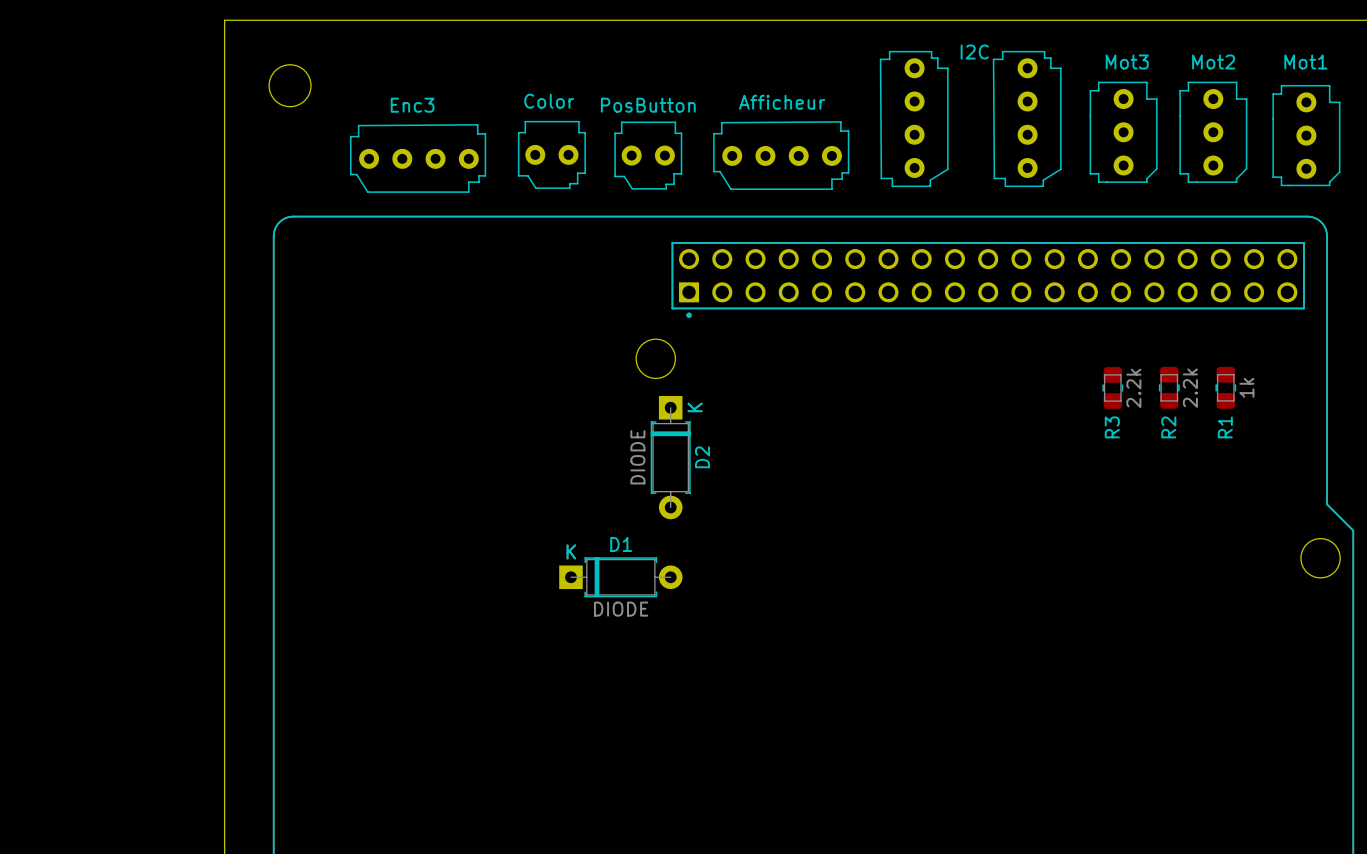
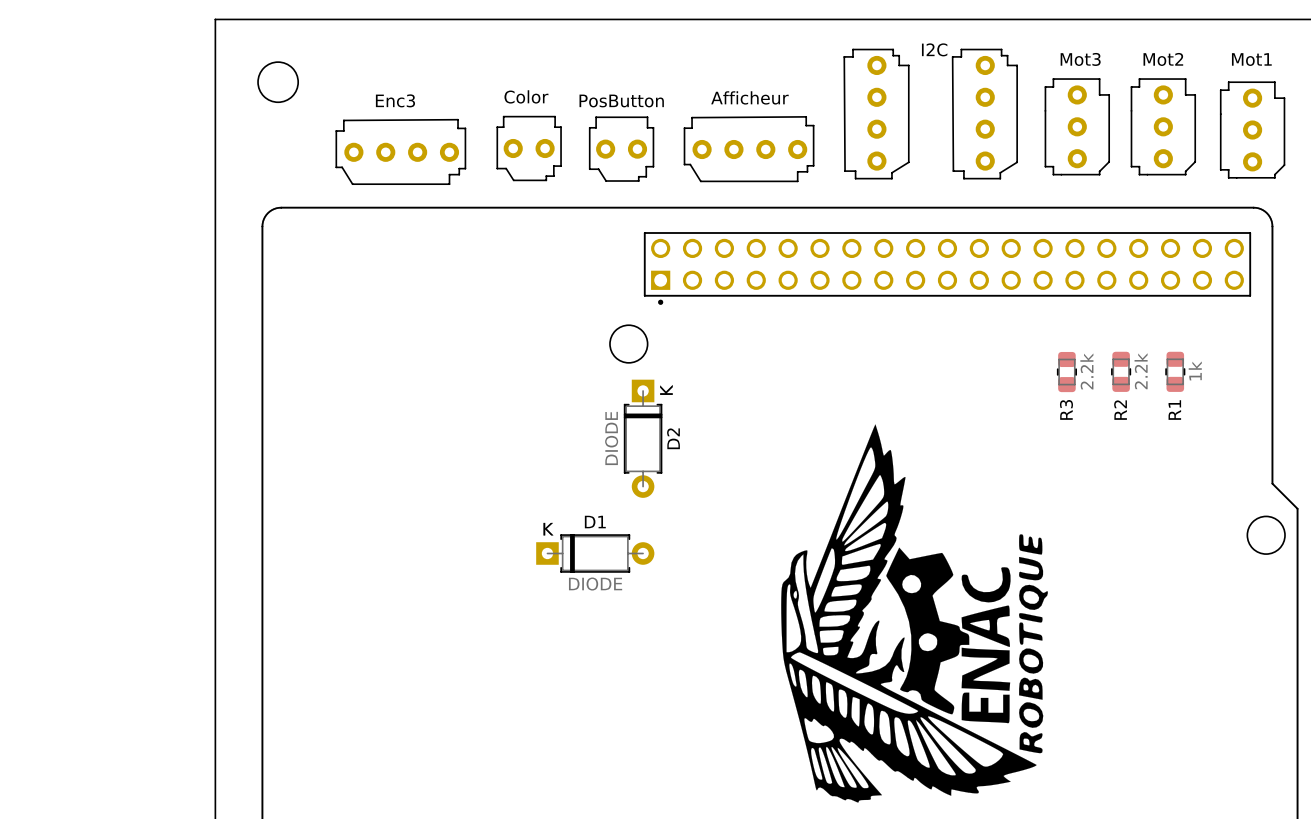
drawing: none -> [781, 424, 1048, 803]

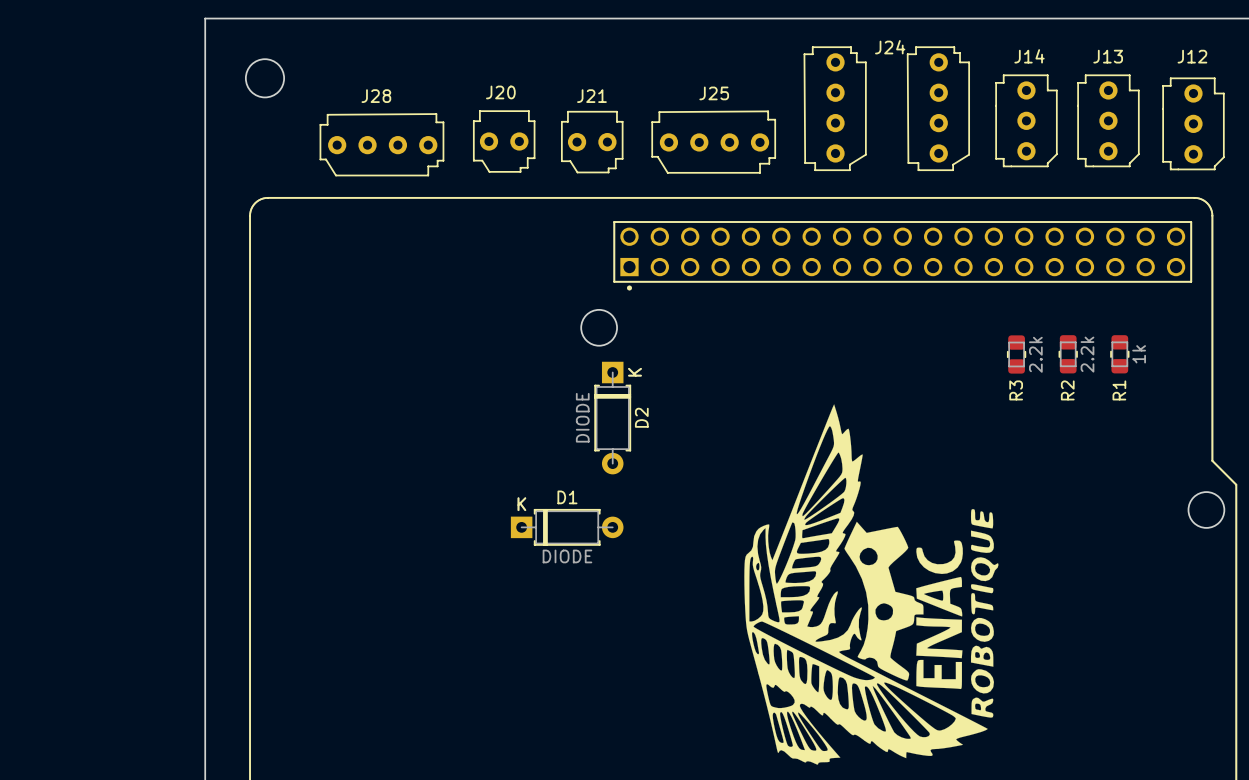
I2C name: I2C (934, 49) -> J24 (890, 47)
Mot3 name: Mot3 (1080, 59) -> J14 (1029, 56)
Mot2 name: Mot2 (1163, 59) -> J13 (1108, 56)
Mot1 name: Mot1 (1251, 59) -> J12 (1192, 56)
Color name: Color (526, 96) -> J20 (500, 92)
Afficheur name: Afficheur (749, 97) -> J25 (714, 93)
Enc3 name: Enc3 (395, 100) -> J28 (376, 96)
PosButton name: PosButton (621, 100) -> J21 (591, 96)

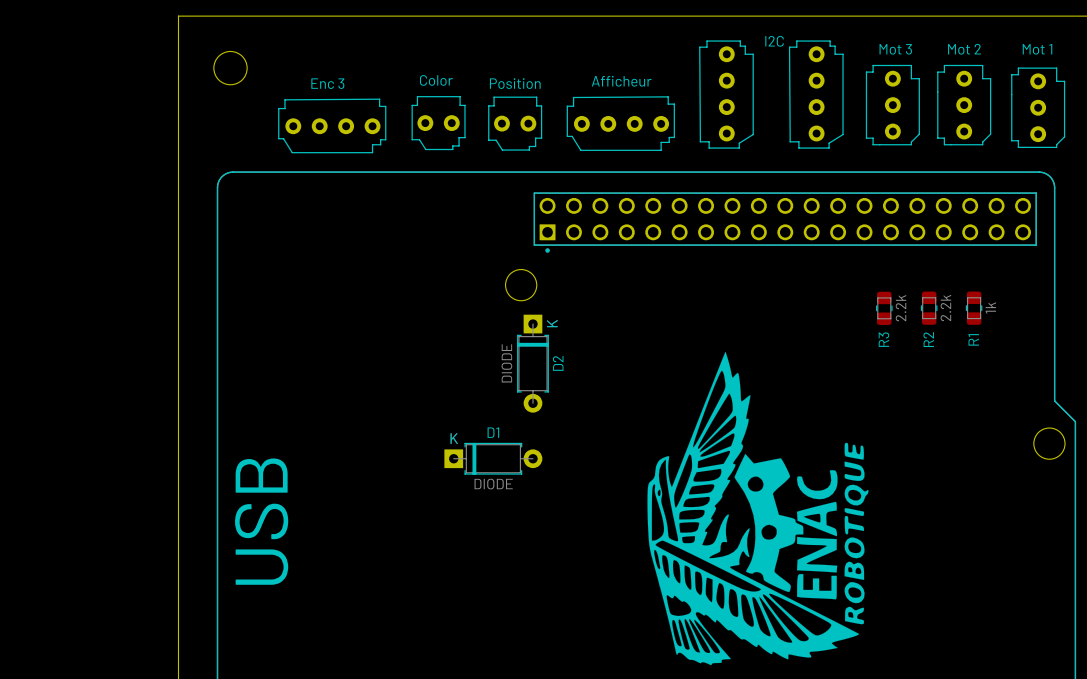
J24 name: J24 (890, 47) -> I2C (774, 41)
J14 name: J14 (1029, 56) -> Mot 3 (895, 49)
J13 name: J13 (1108, 56) -> Mot 2 (964, 49)
J12 name: J12 (1192, 56) -> Mot 1 (1037, 49)
J20 name: J20 (500, 92) -> Color (436, 80)
J25 name: J25 (714, 93) -> Afficheur (621, 81)
J28 name: J28 (376, 96) -> Enc 3 (327, 83)
J21 name: J21 (591, 96) -> Position (515, 83)
text: none -> USB (261, 521)

